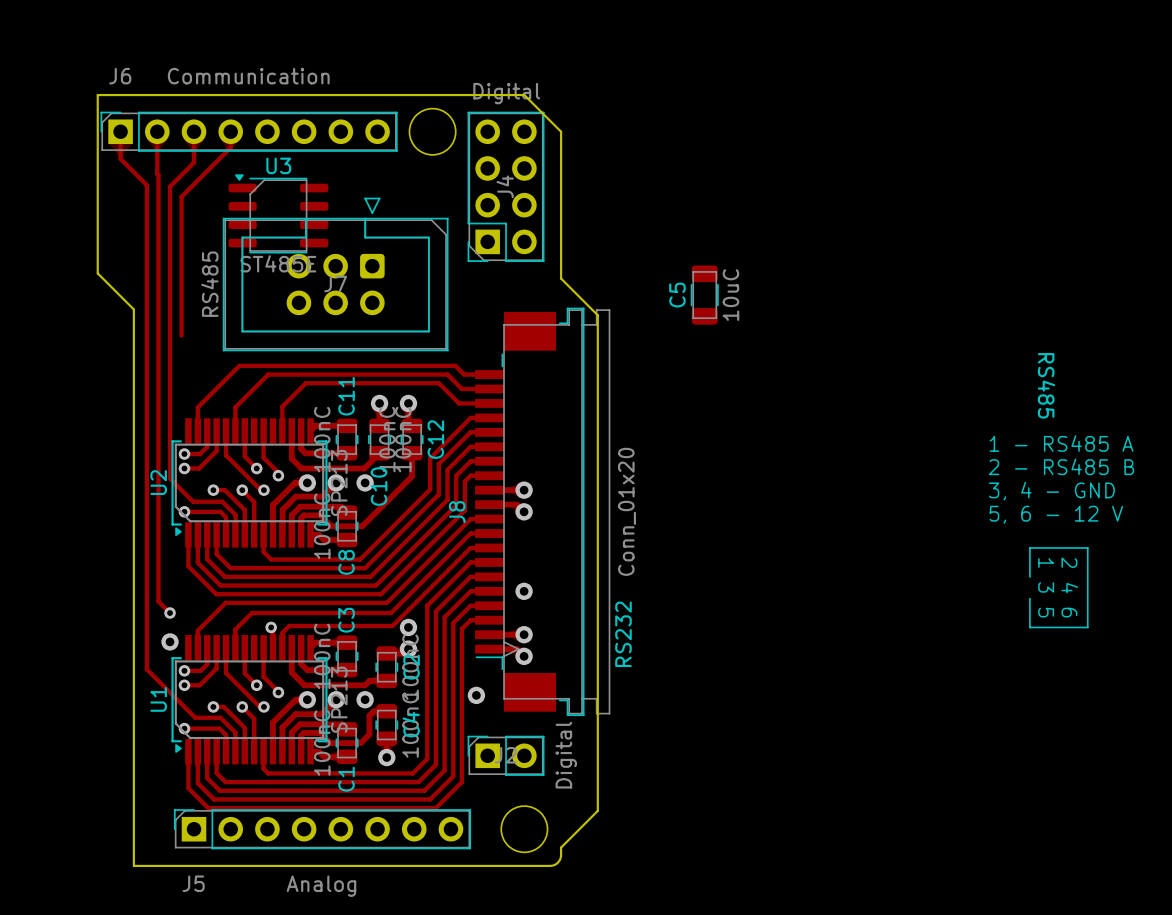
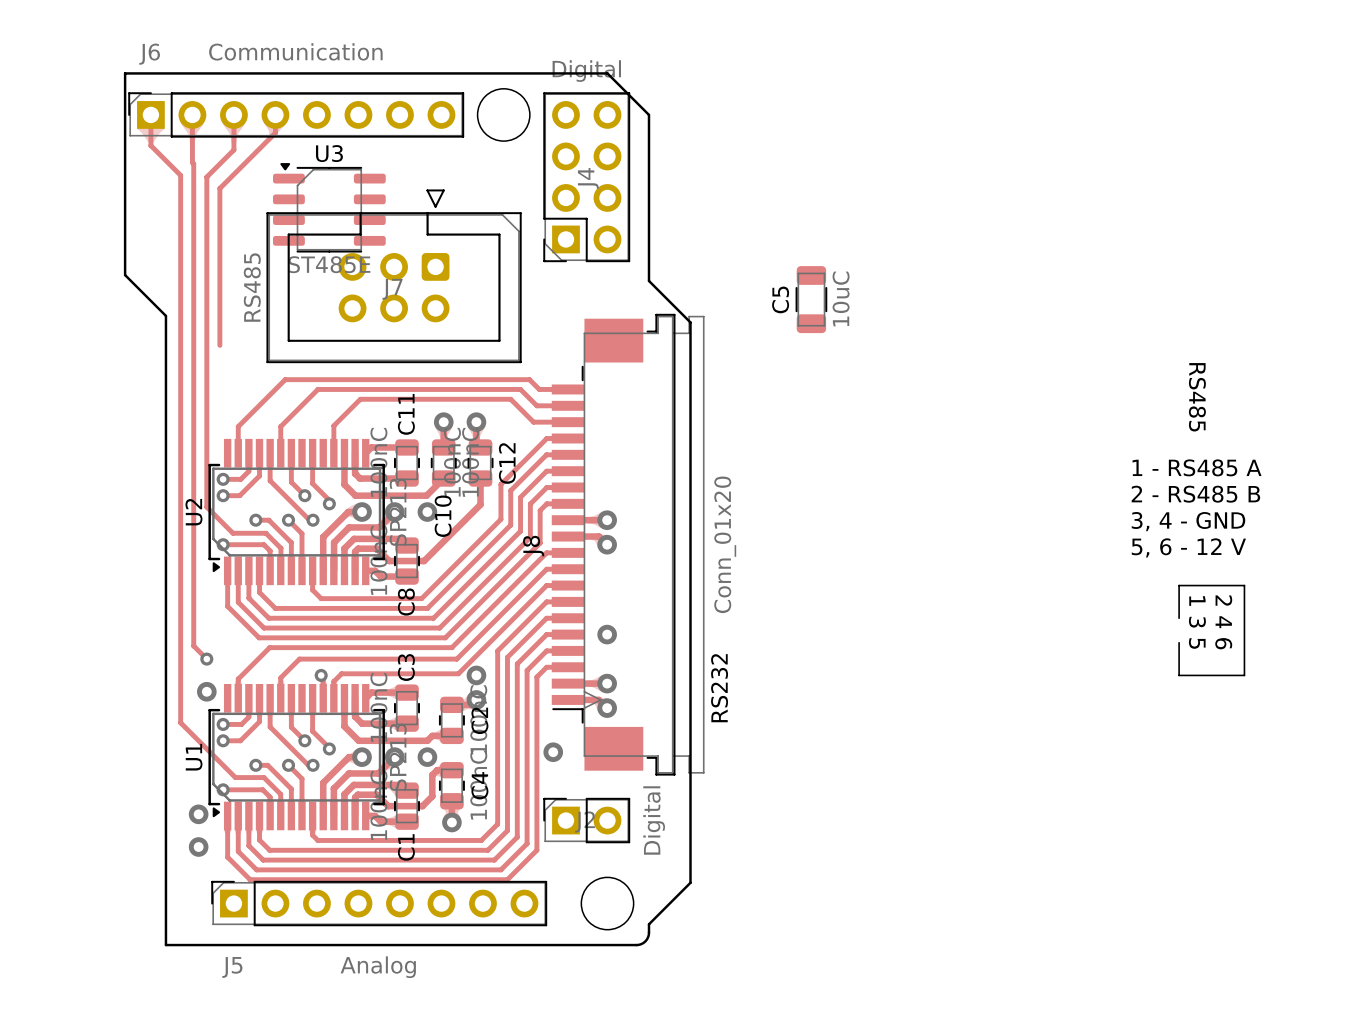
via: none -> (198, 814)
via: none -> (198, 847)

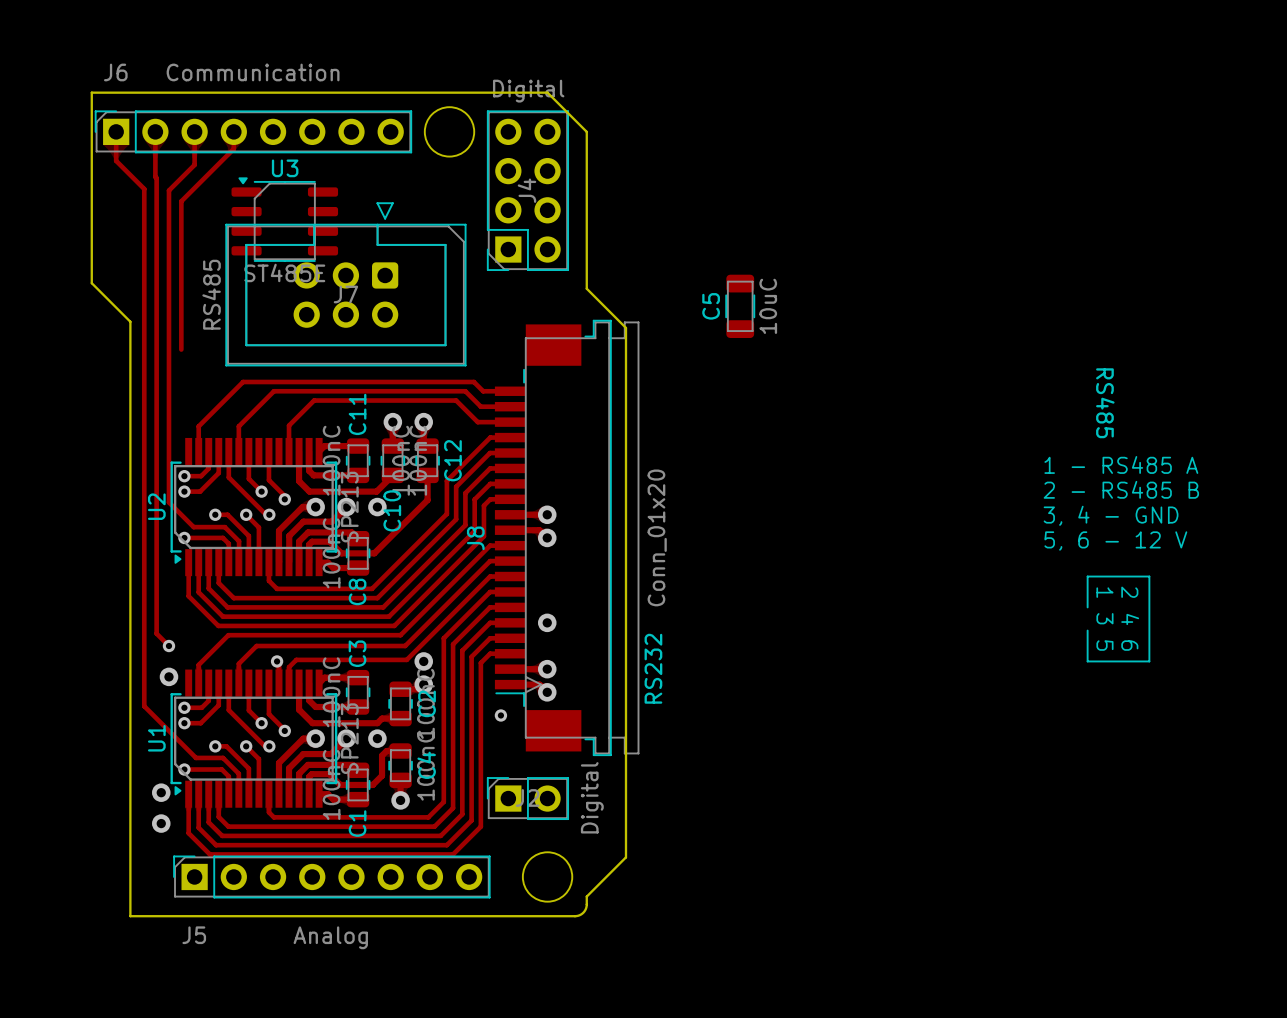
via: none -> (500, 715)
via: (553, 752) -> none

